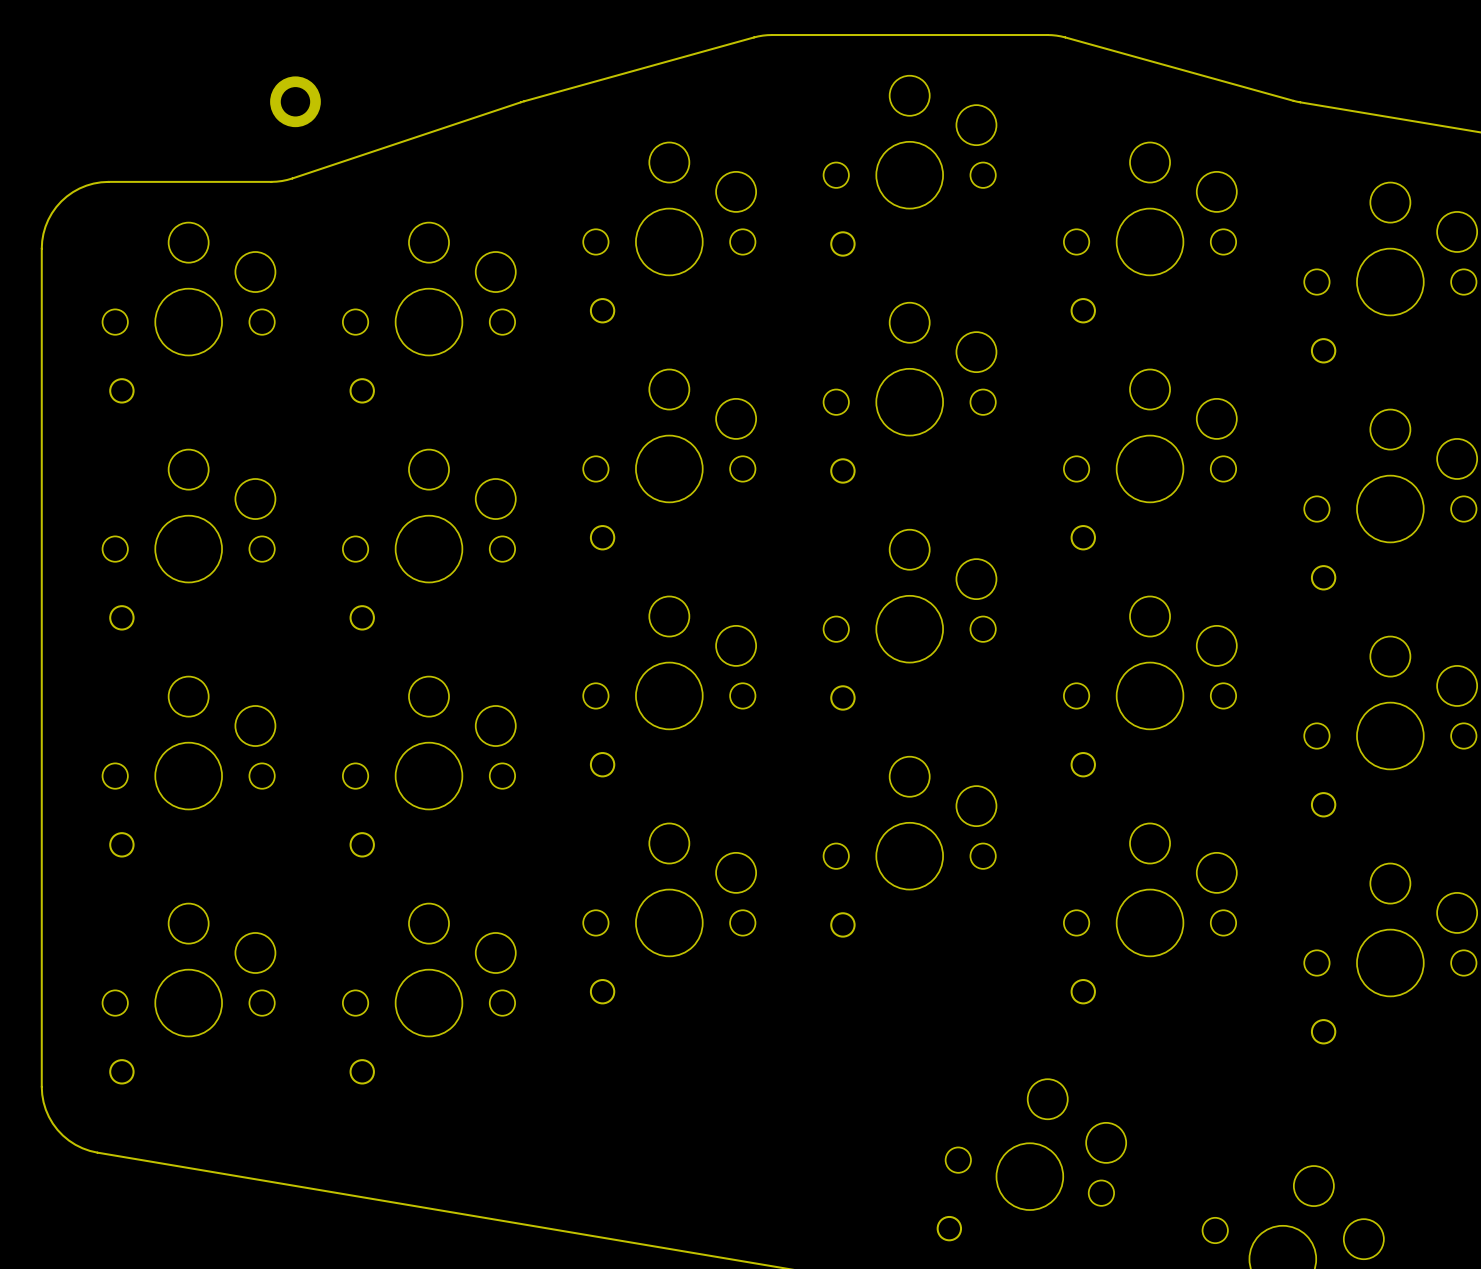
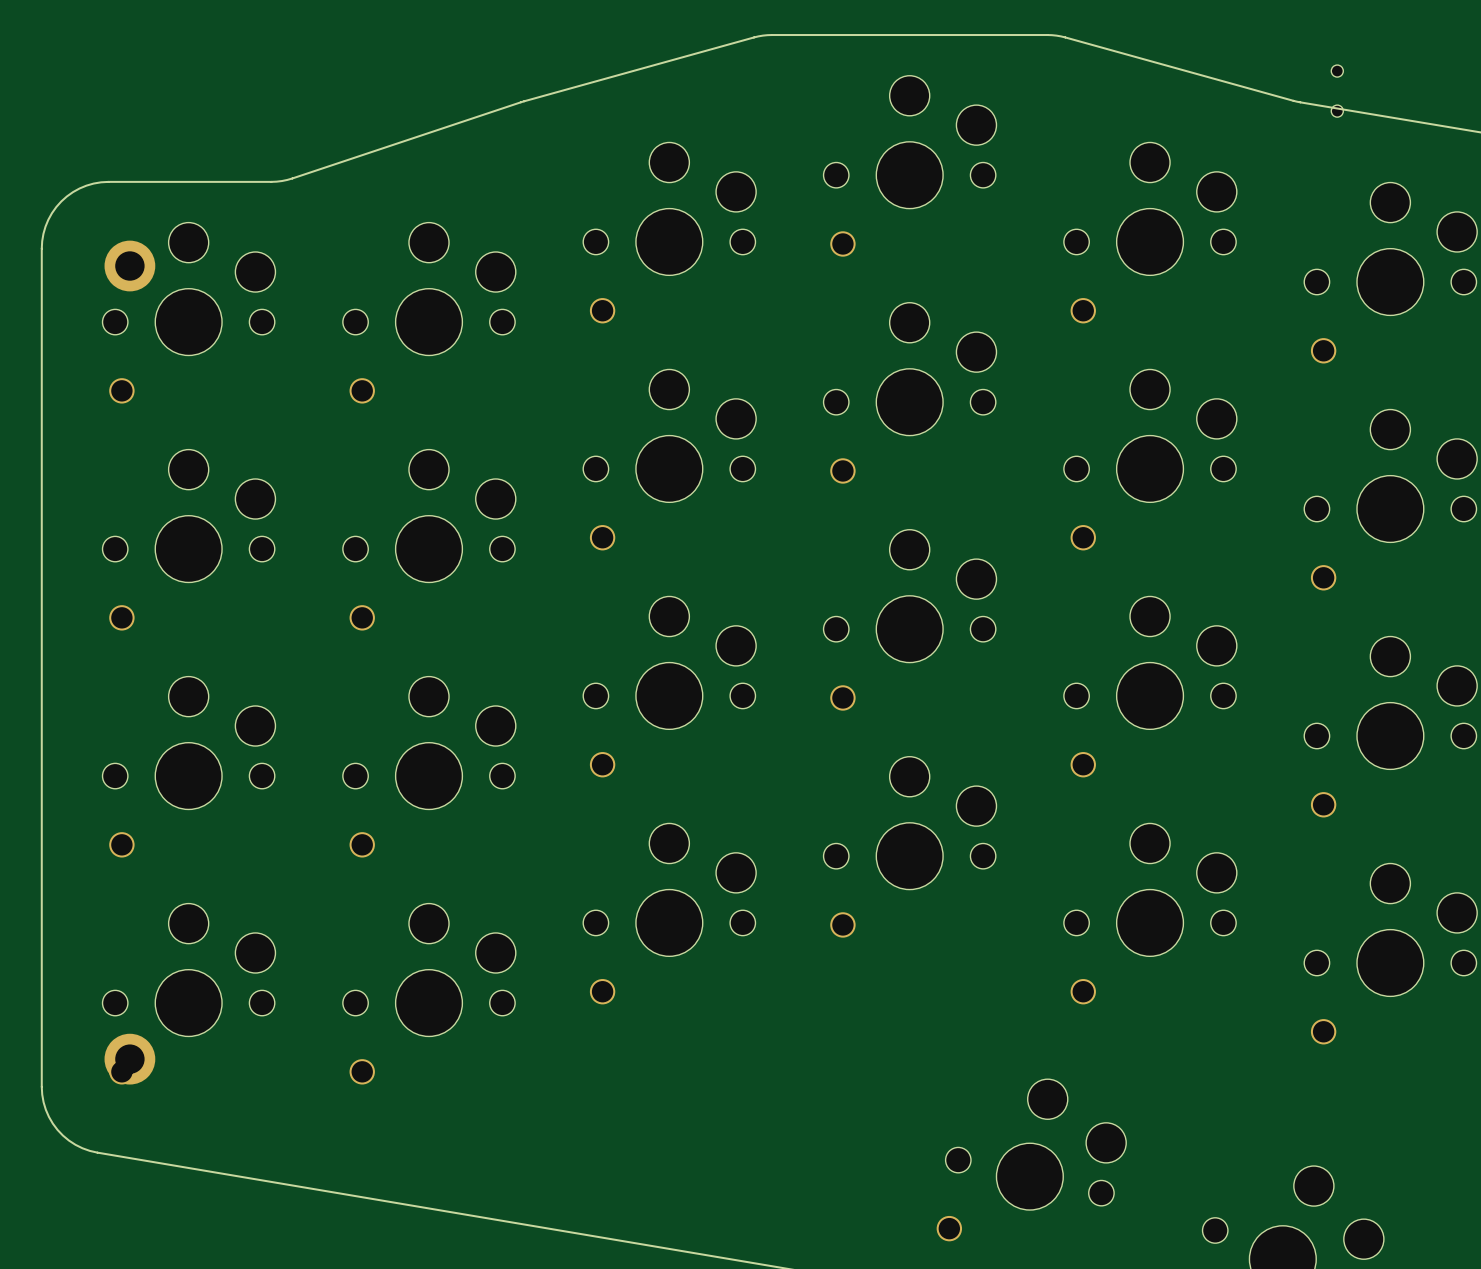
part: none -> (1337, 91)
part position: (295, 101) -> (129, 266)
part: none -> (129, 1059)

